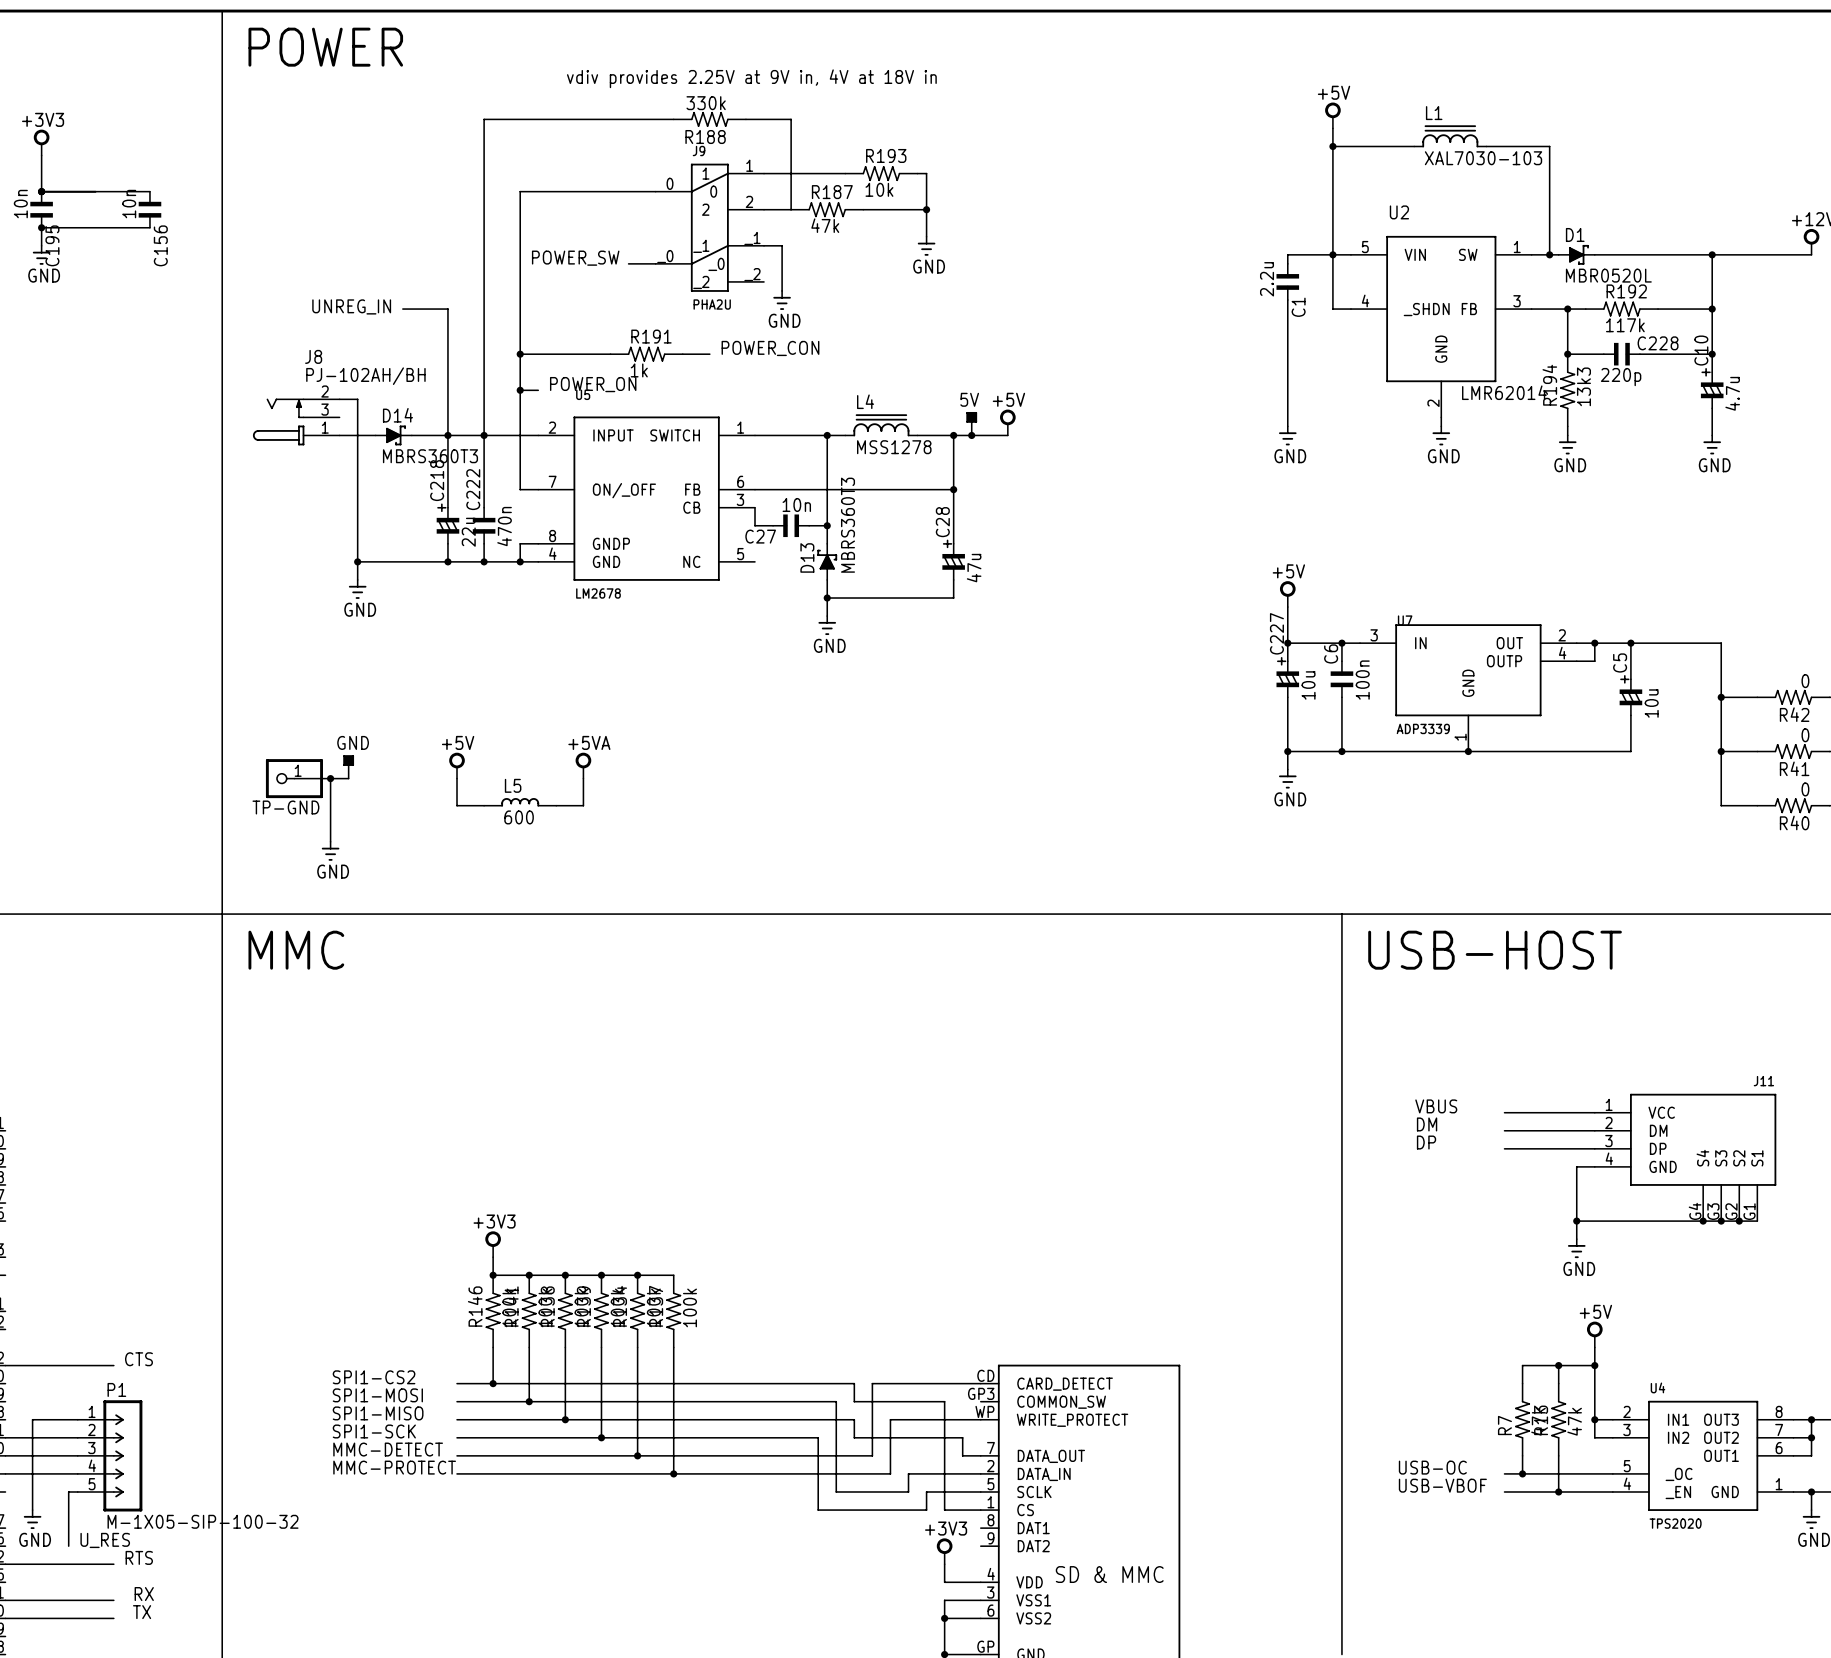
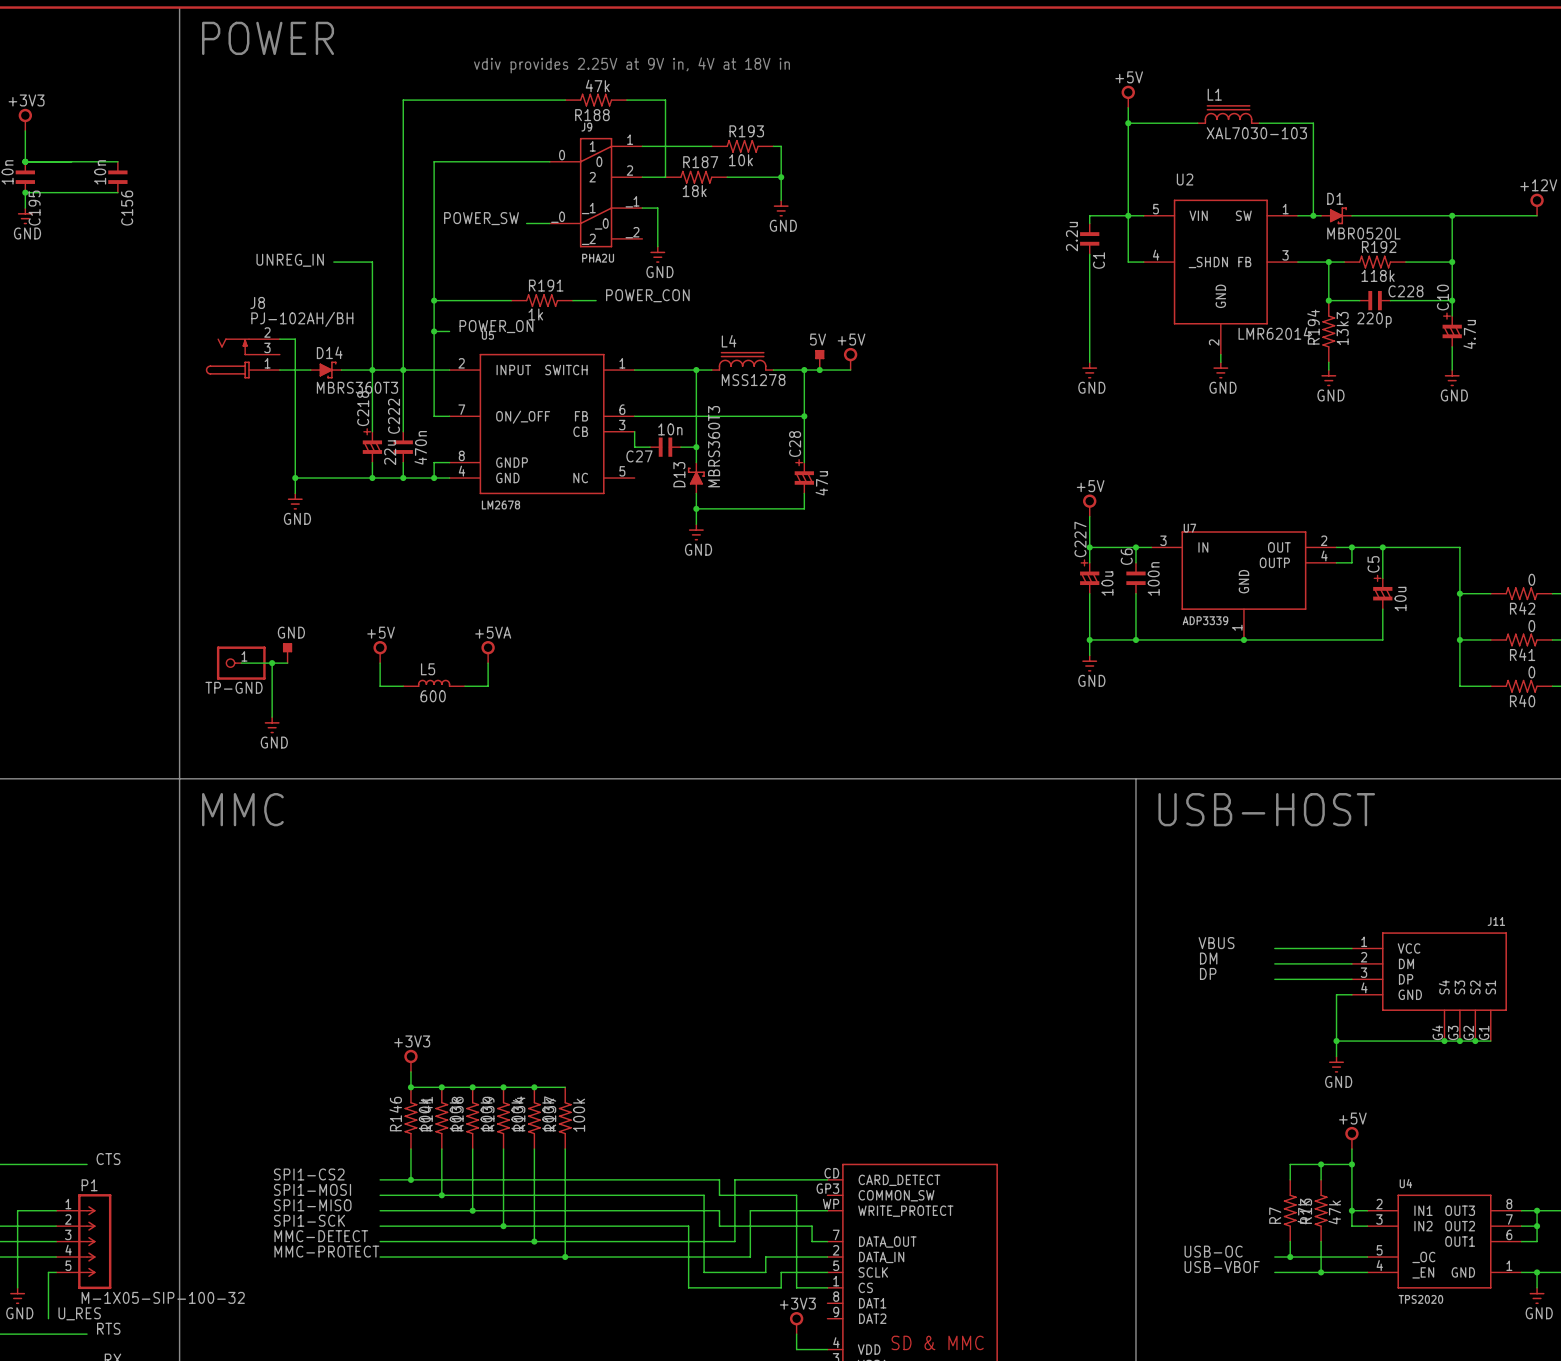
R188 value: 330k (706, 103) -> 47k (597, 85)
R187 value: 47k (825, 225) -> 18k (694, 191)
R192 value: 117k (1625, 325) -> 118k (1378, 275)

